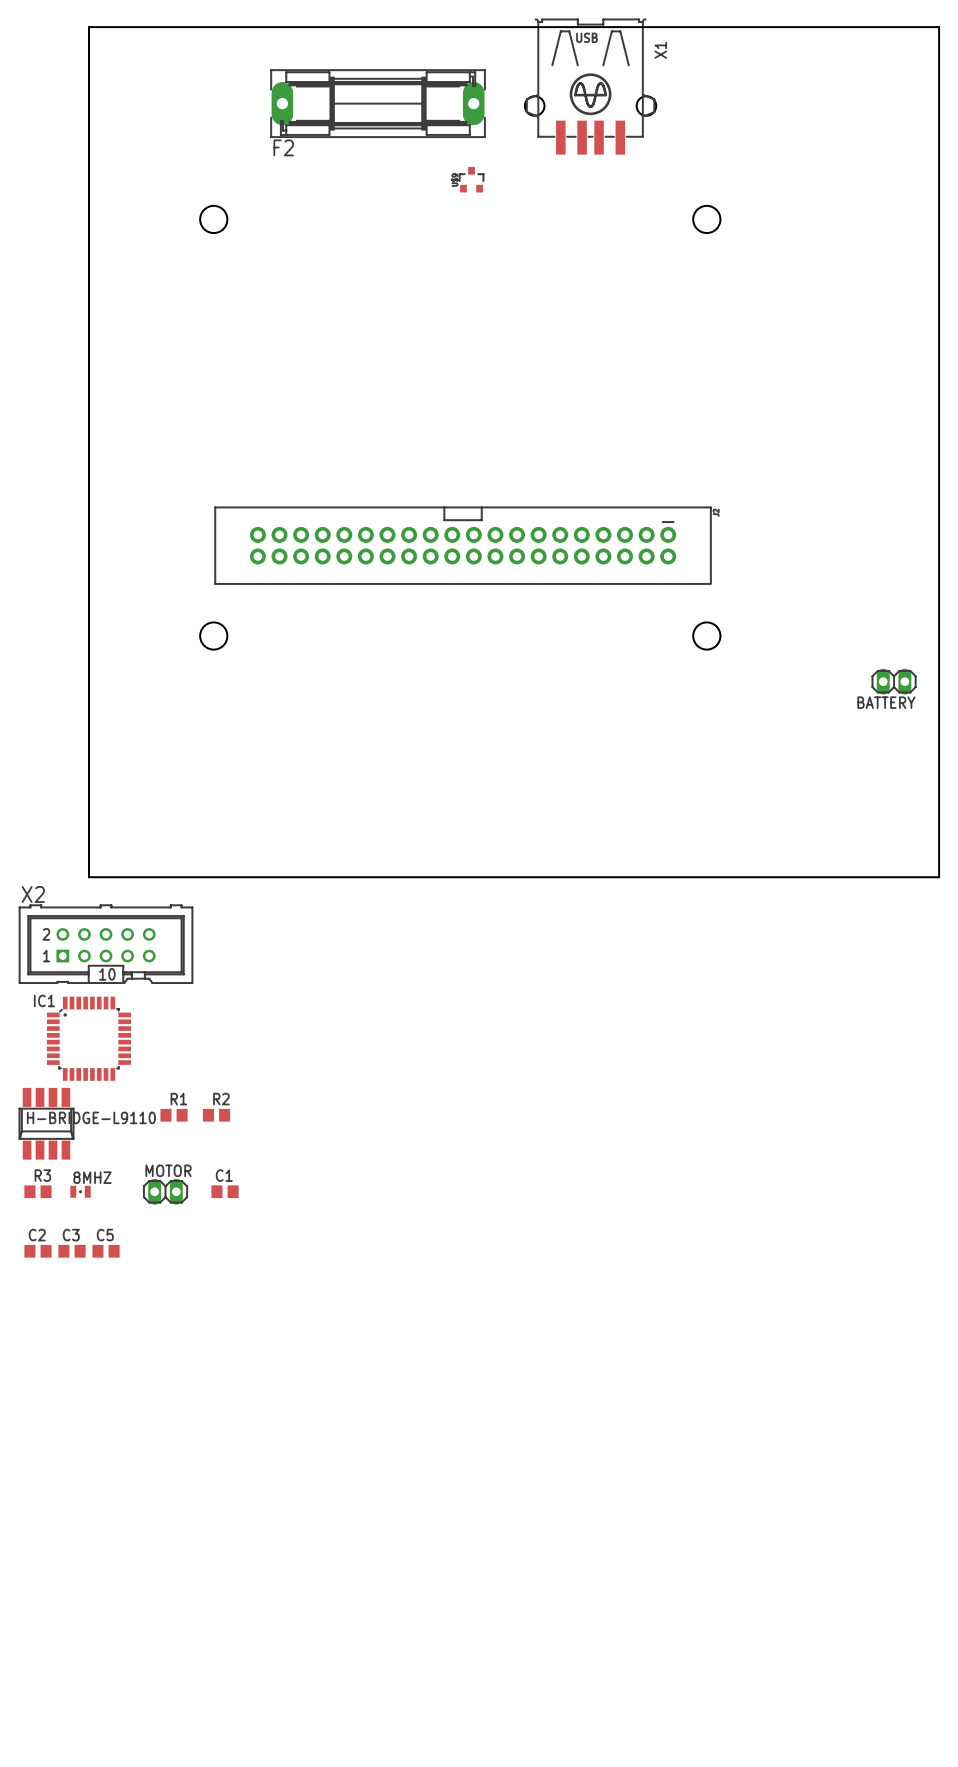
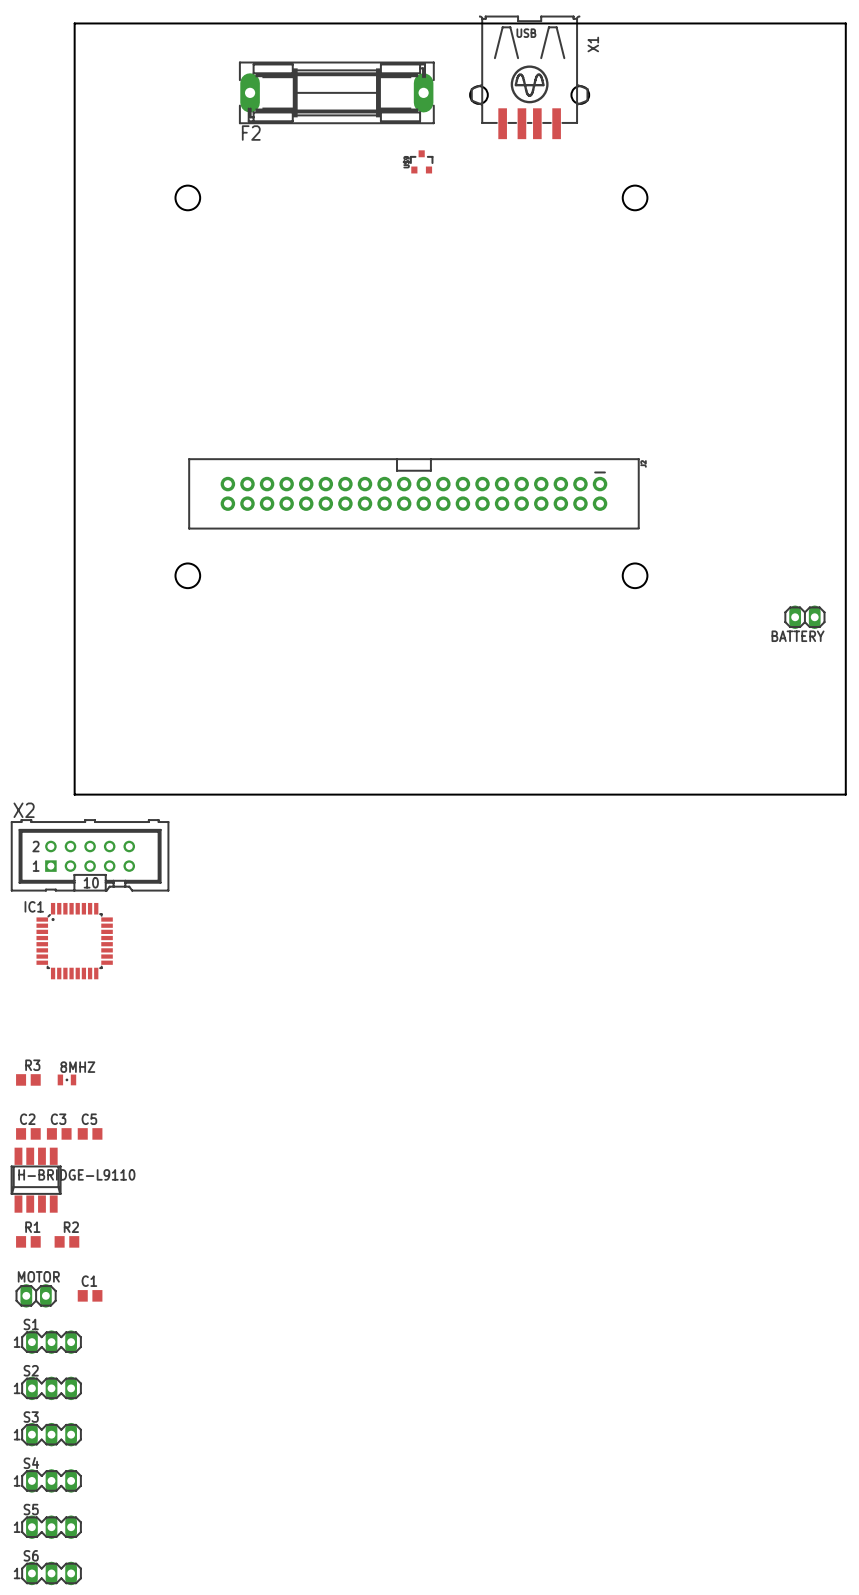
R1 position: (174, 1115) -> (28, 1241)
R2 position: (216, 1115) -> (66, 1241)
H-BRIDGE-L9110 position: (46, 1123) -> (36, 1180)
MOTOR: (165, 1191) -> none
C1 position: (225, 1191) -> (90, 1295)
MOTOR: none -> (36, 1295)
S1: none -> (51, 1342)
S2: none -> (51, 1388)
S3: none -> (51, 1434)
S4: none -> (51, 1480)
S5: none -> (51, 1527)
S6: none -> (51, 1573)

